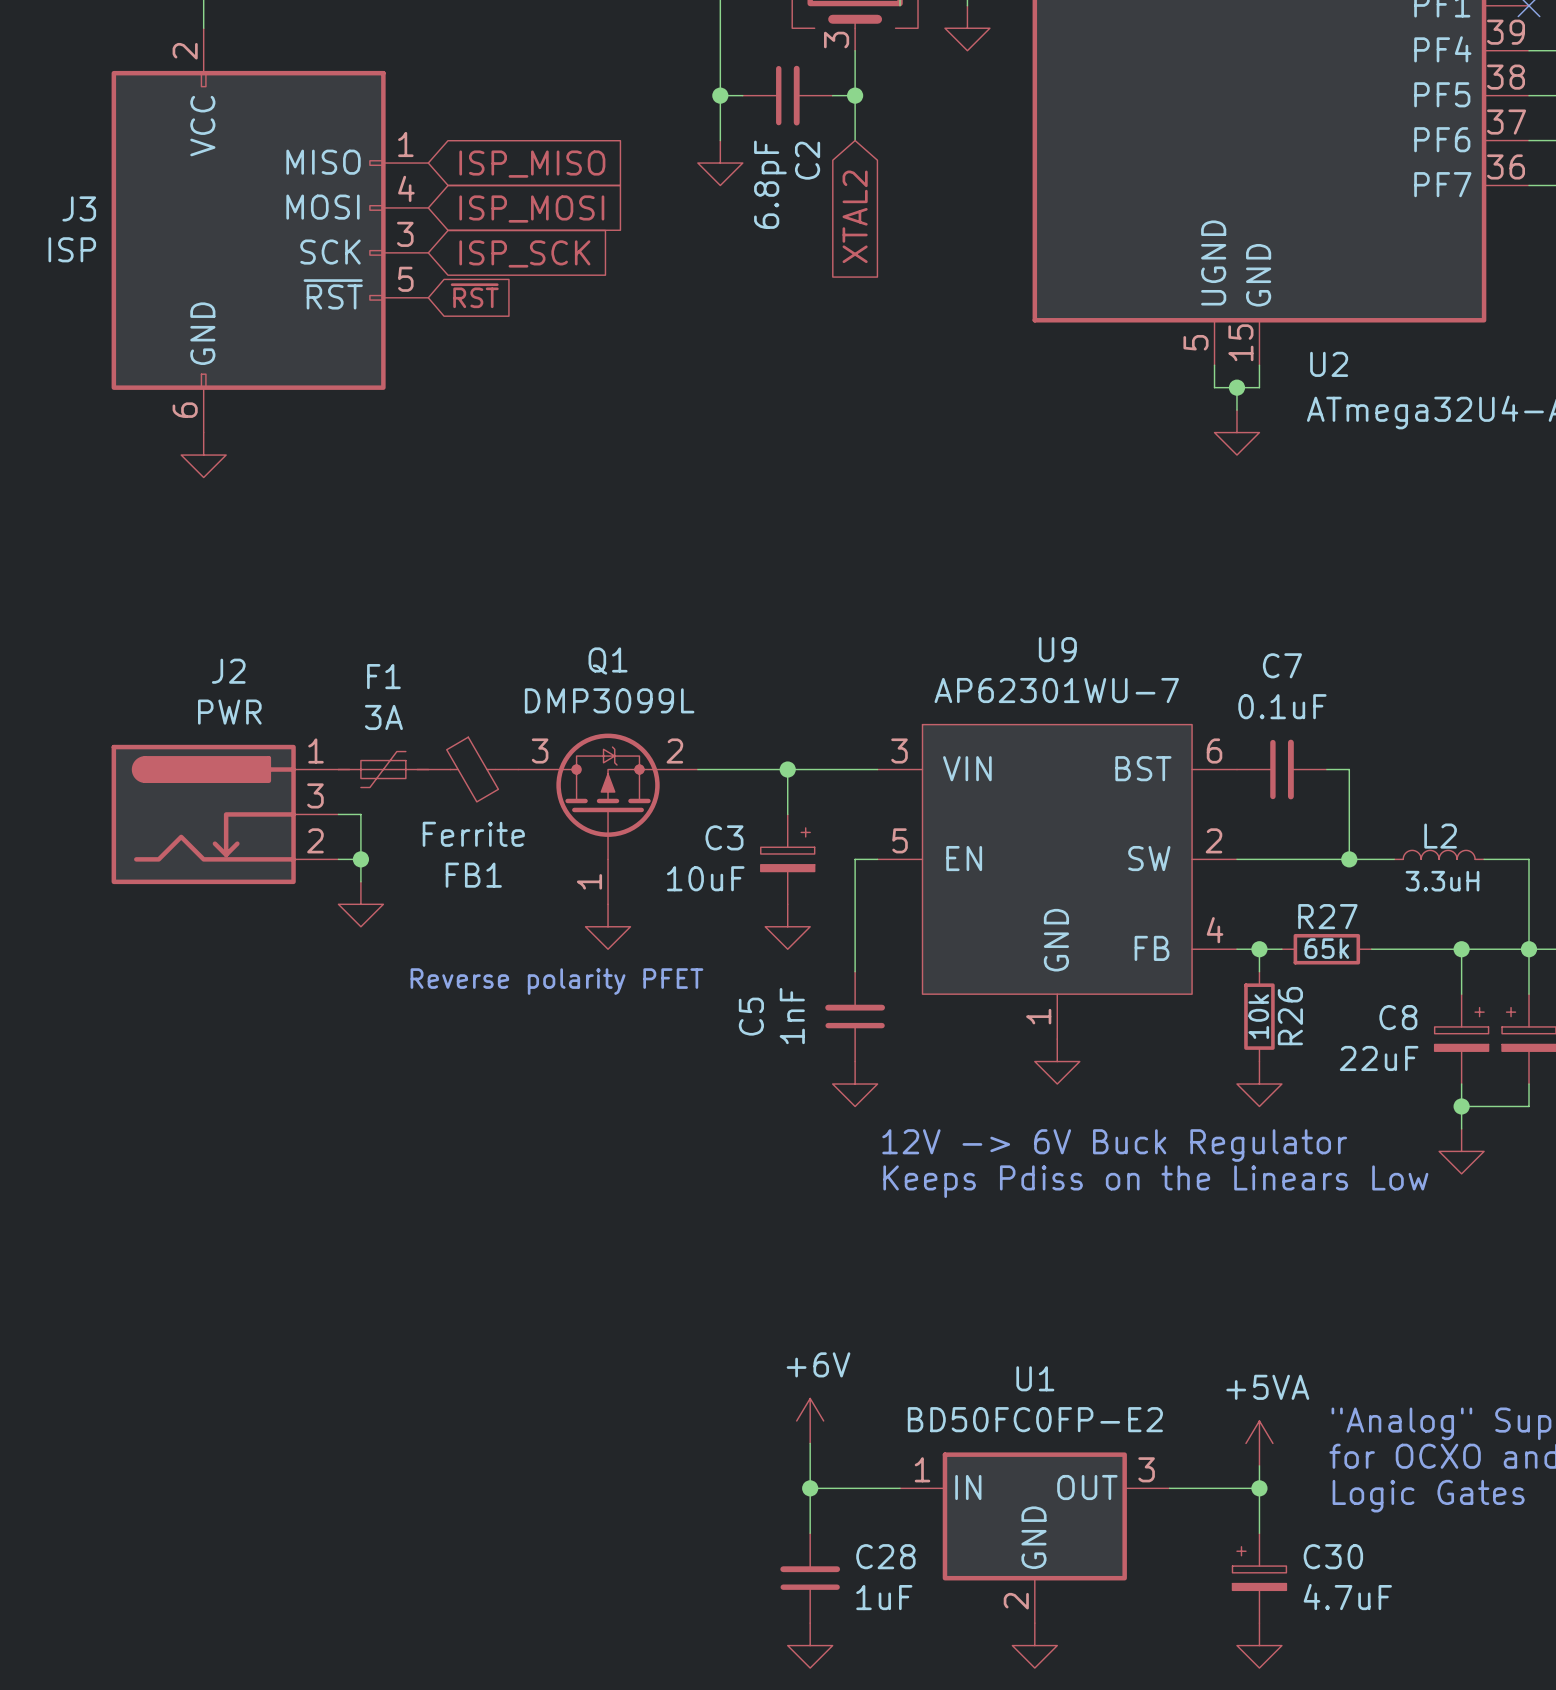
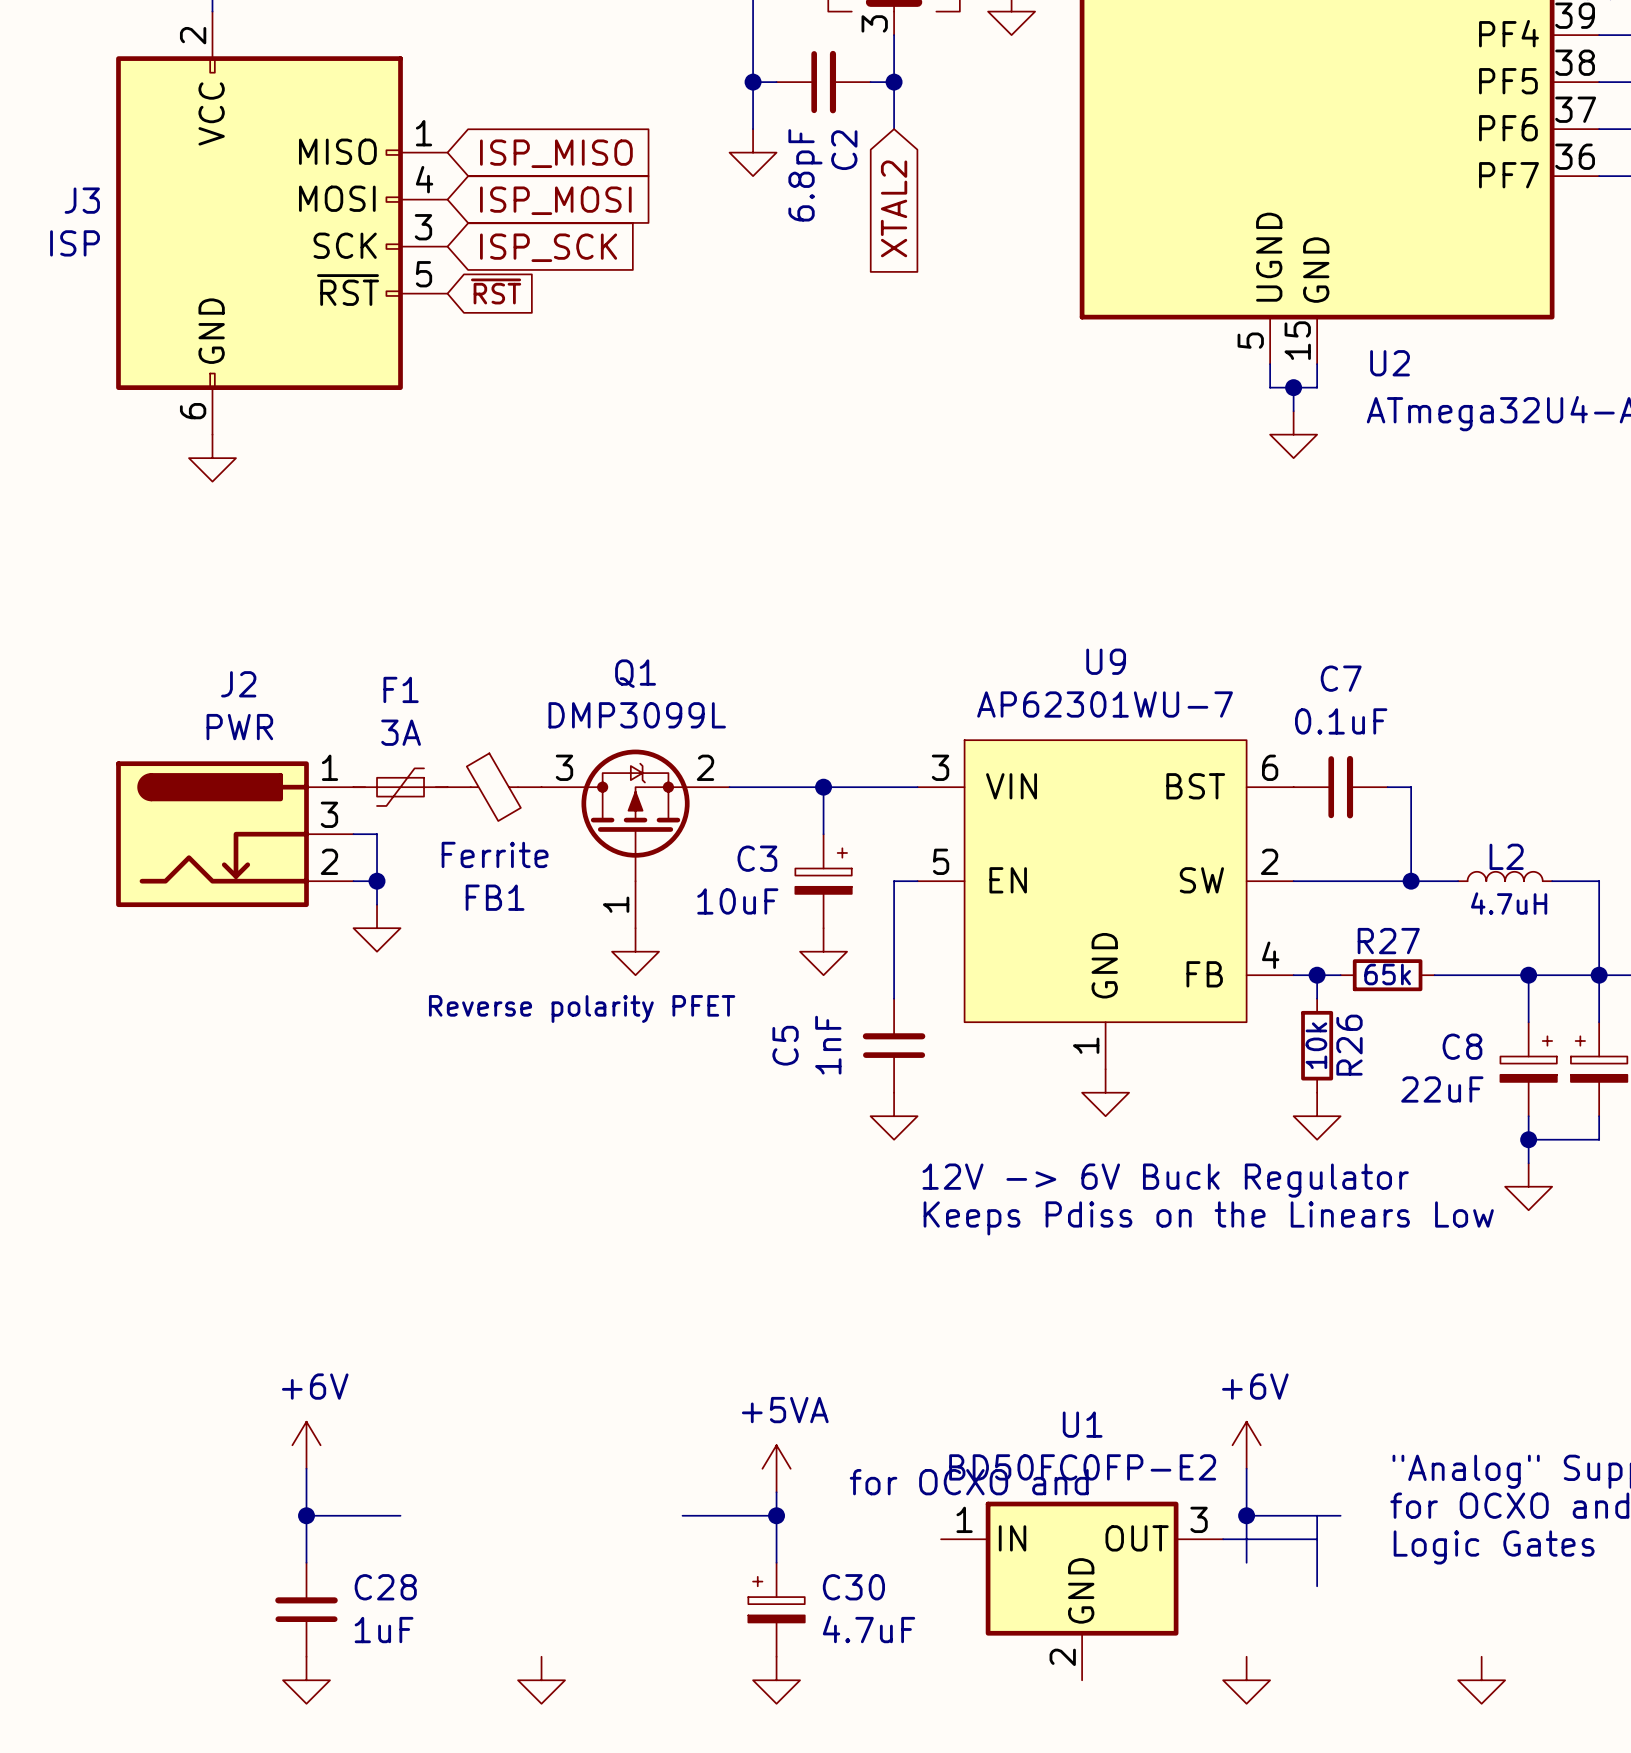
L2 value: 3.3uH (1442, 881) -> 4.7uH (1509, 903)
power symbol: none -> +6V (306, 1445)
power symbol: none -> +6V (1246, 1445)
wire: none -> (306, 1468) (306, 1562)
power symbol: none -> +5VA (776, 1468)
power symbol: +6V (810, 1420) -> none
text: none -> for OCXO and (969, 1482)
wire: none -> (776, 1492) (776, 1562)
wire: (810, 1443) (810, 1533) -> (1246, 1468) (1246, 1562)
power symbol: +5VA (1259, 1443) -> none
wire: none -> (306, 1515) (400, 1515)
junction: none -> (306, 1515)
wire: none -> (682, 1515) (776, 1515)
wire: (810, 1488) (900, 1488) -> (1246, 1515) (1340, 1515)
junction position: (810, 1488) -> (776, 1515)
junction position: (1259, 1488) -> (1246, 1515)
C28 position: (810, 1578) -> (306, 1609)
C30 position: (1259, 1578) -> (776, 1609)
power symbol: none -> (306, 1680)
power symbol: none -> (541, 1680)
power symbol: none -> (1481, 1680)
power symbol position: (810, 1645) -> (776, 1680)
power symbol: (1034, 1645) -> none
power symbol position: (1259, 1645) -> (1246, 1680)

